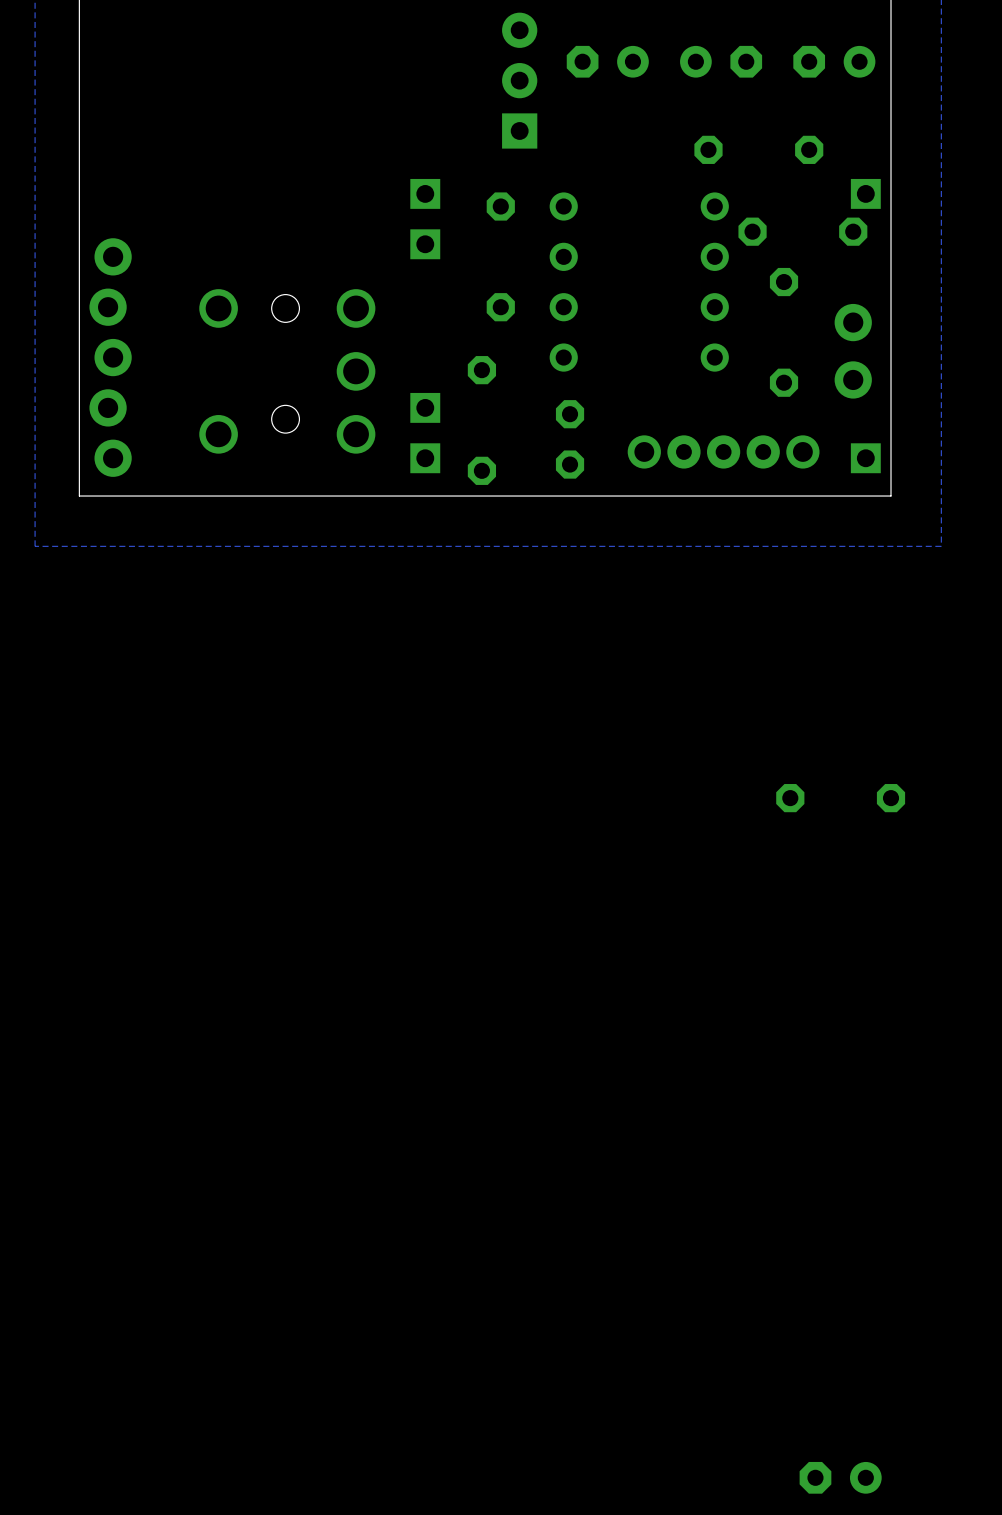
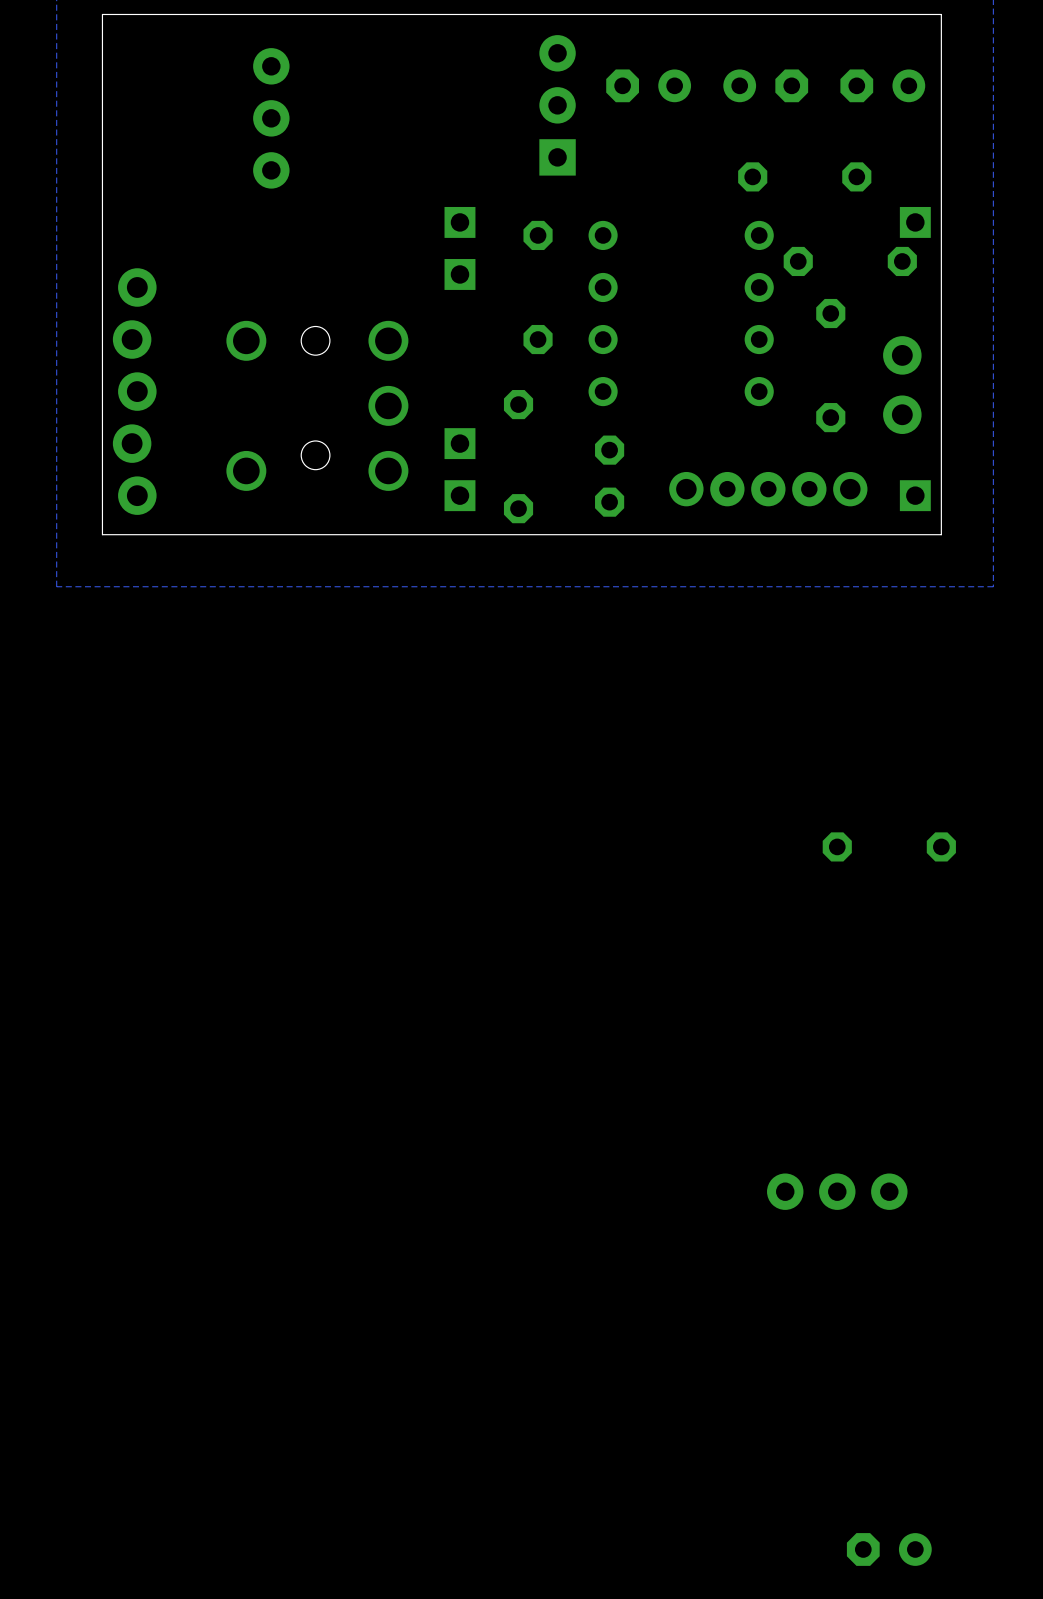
part: none -> (271, 118)
part: none -> (837, 1191)

